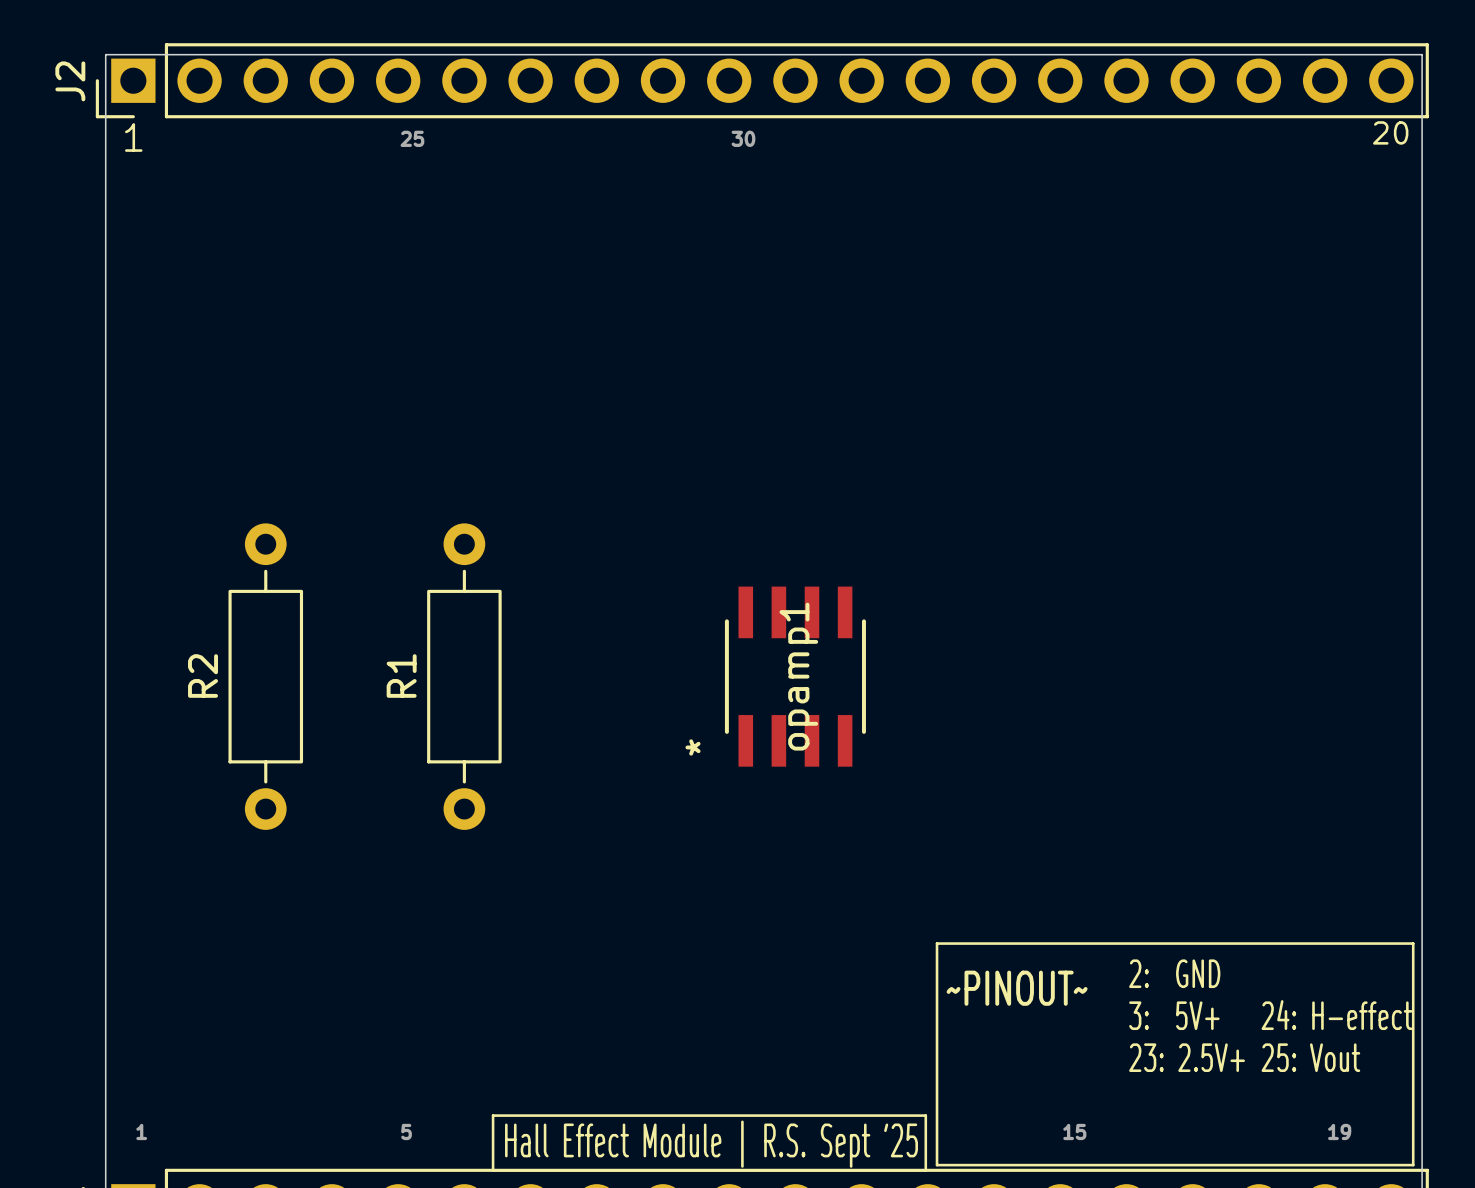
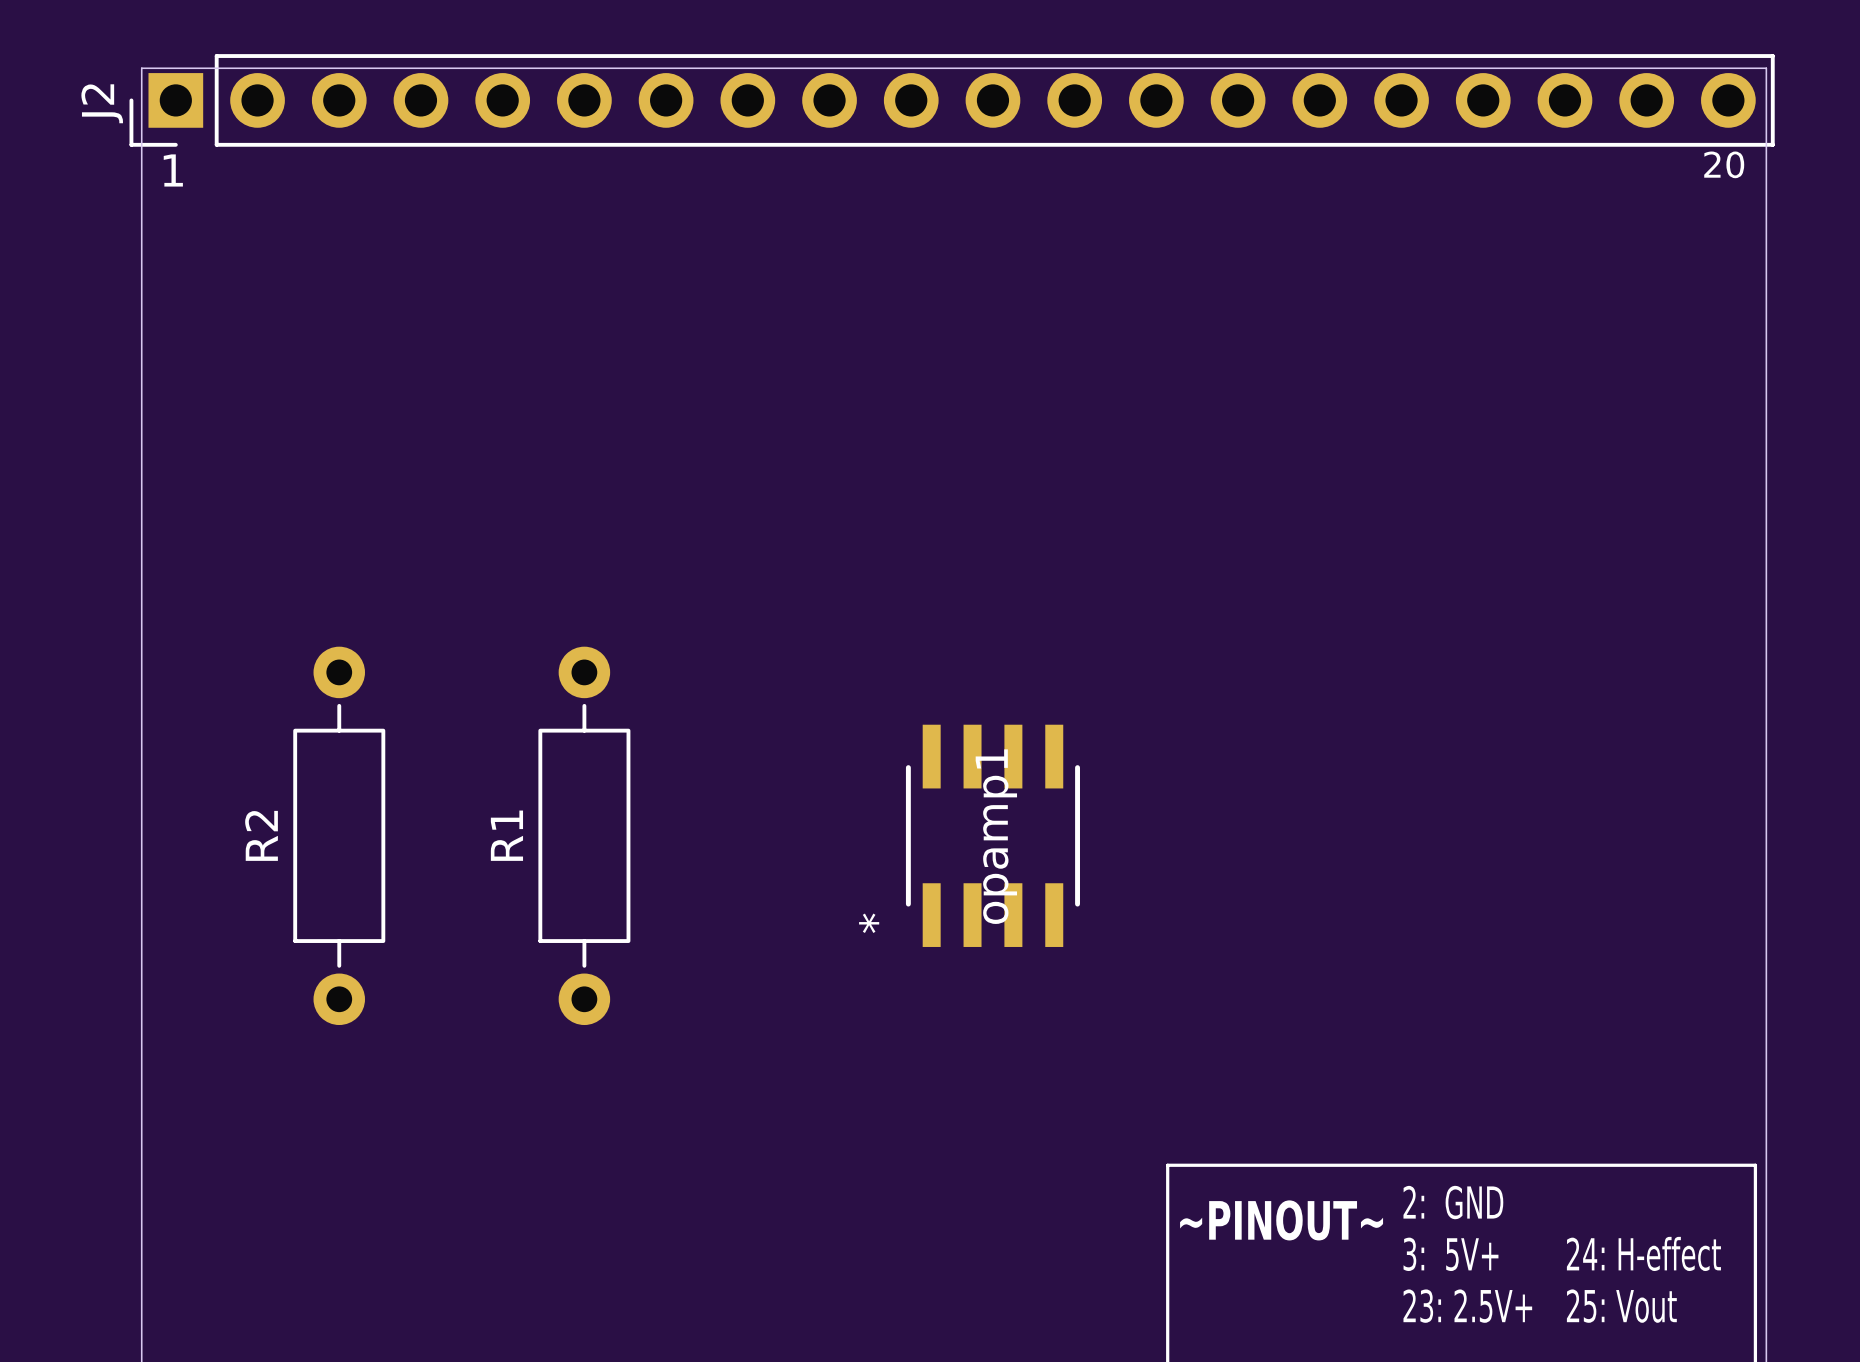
text: 25 (412, 138) -> none
text: 30 (743, 138) -> none

